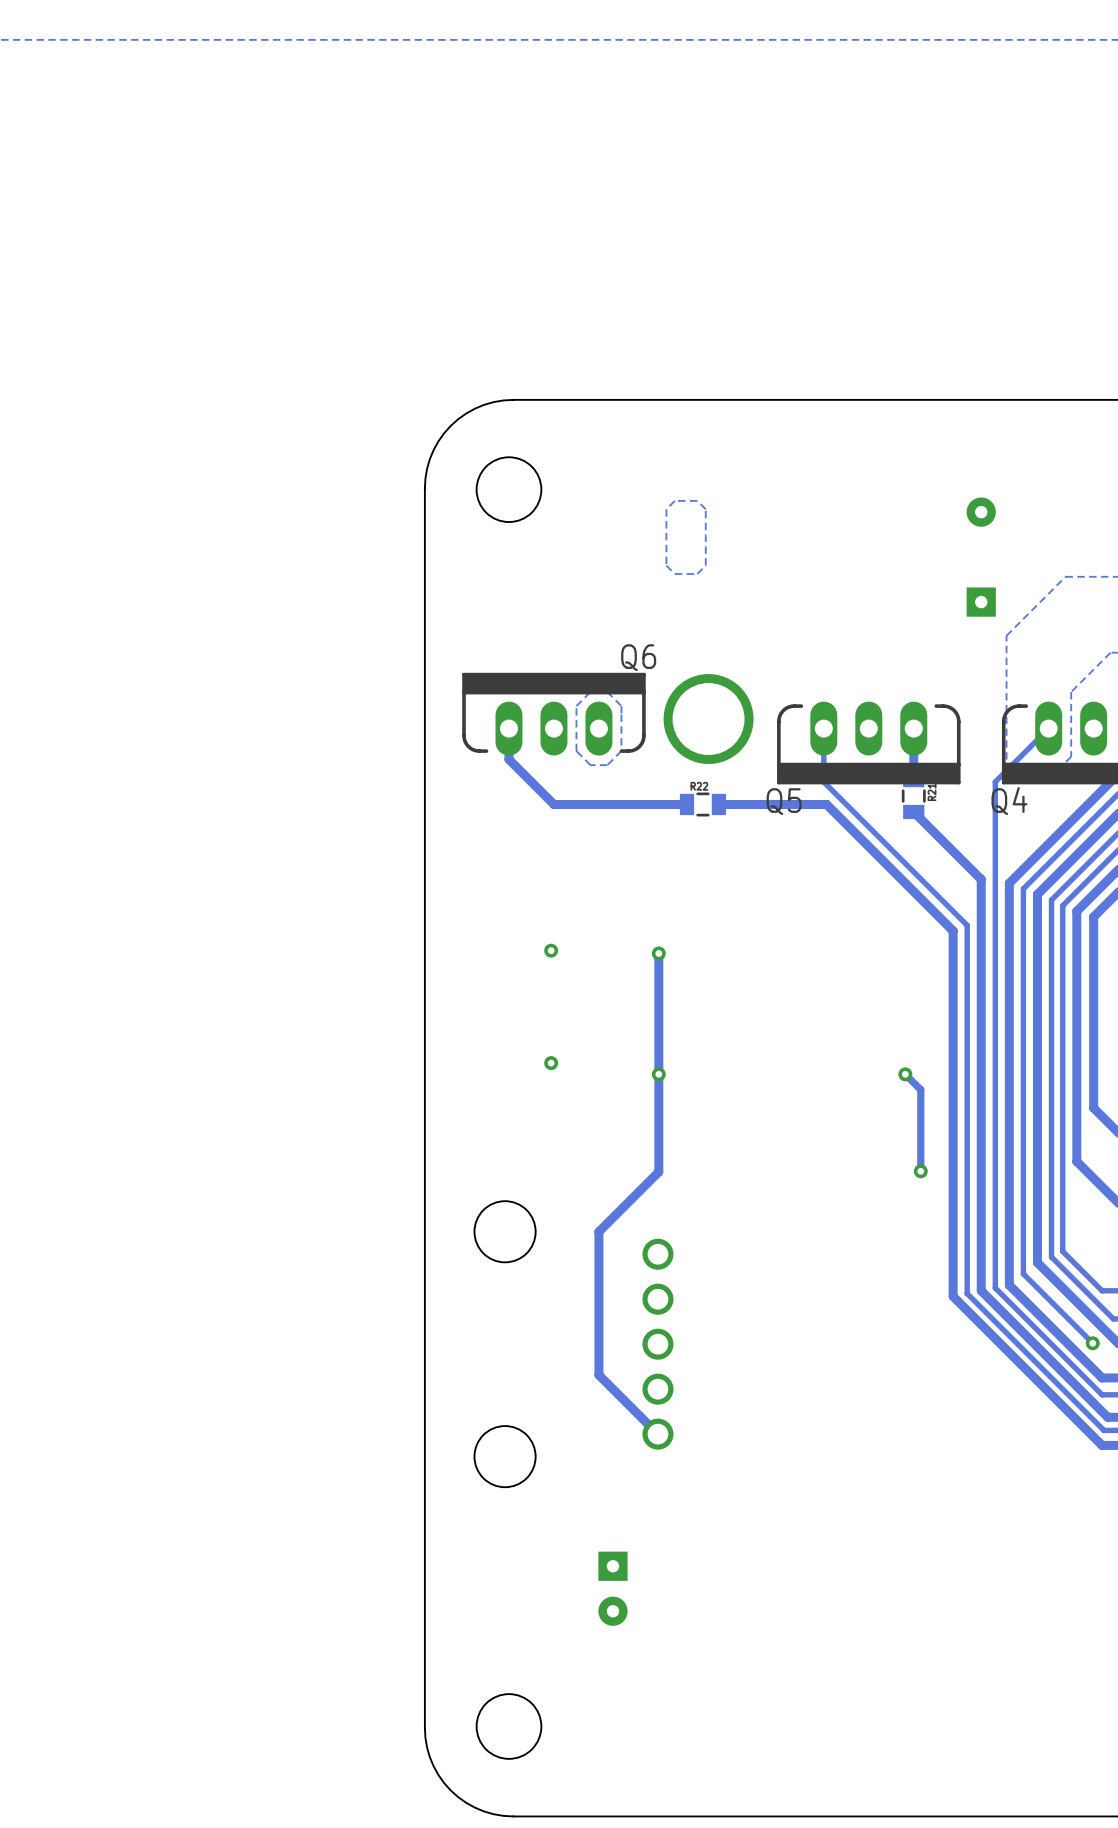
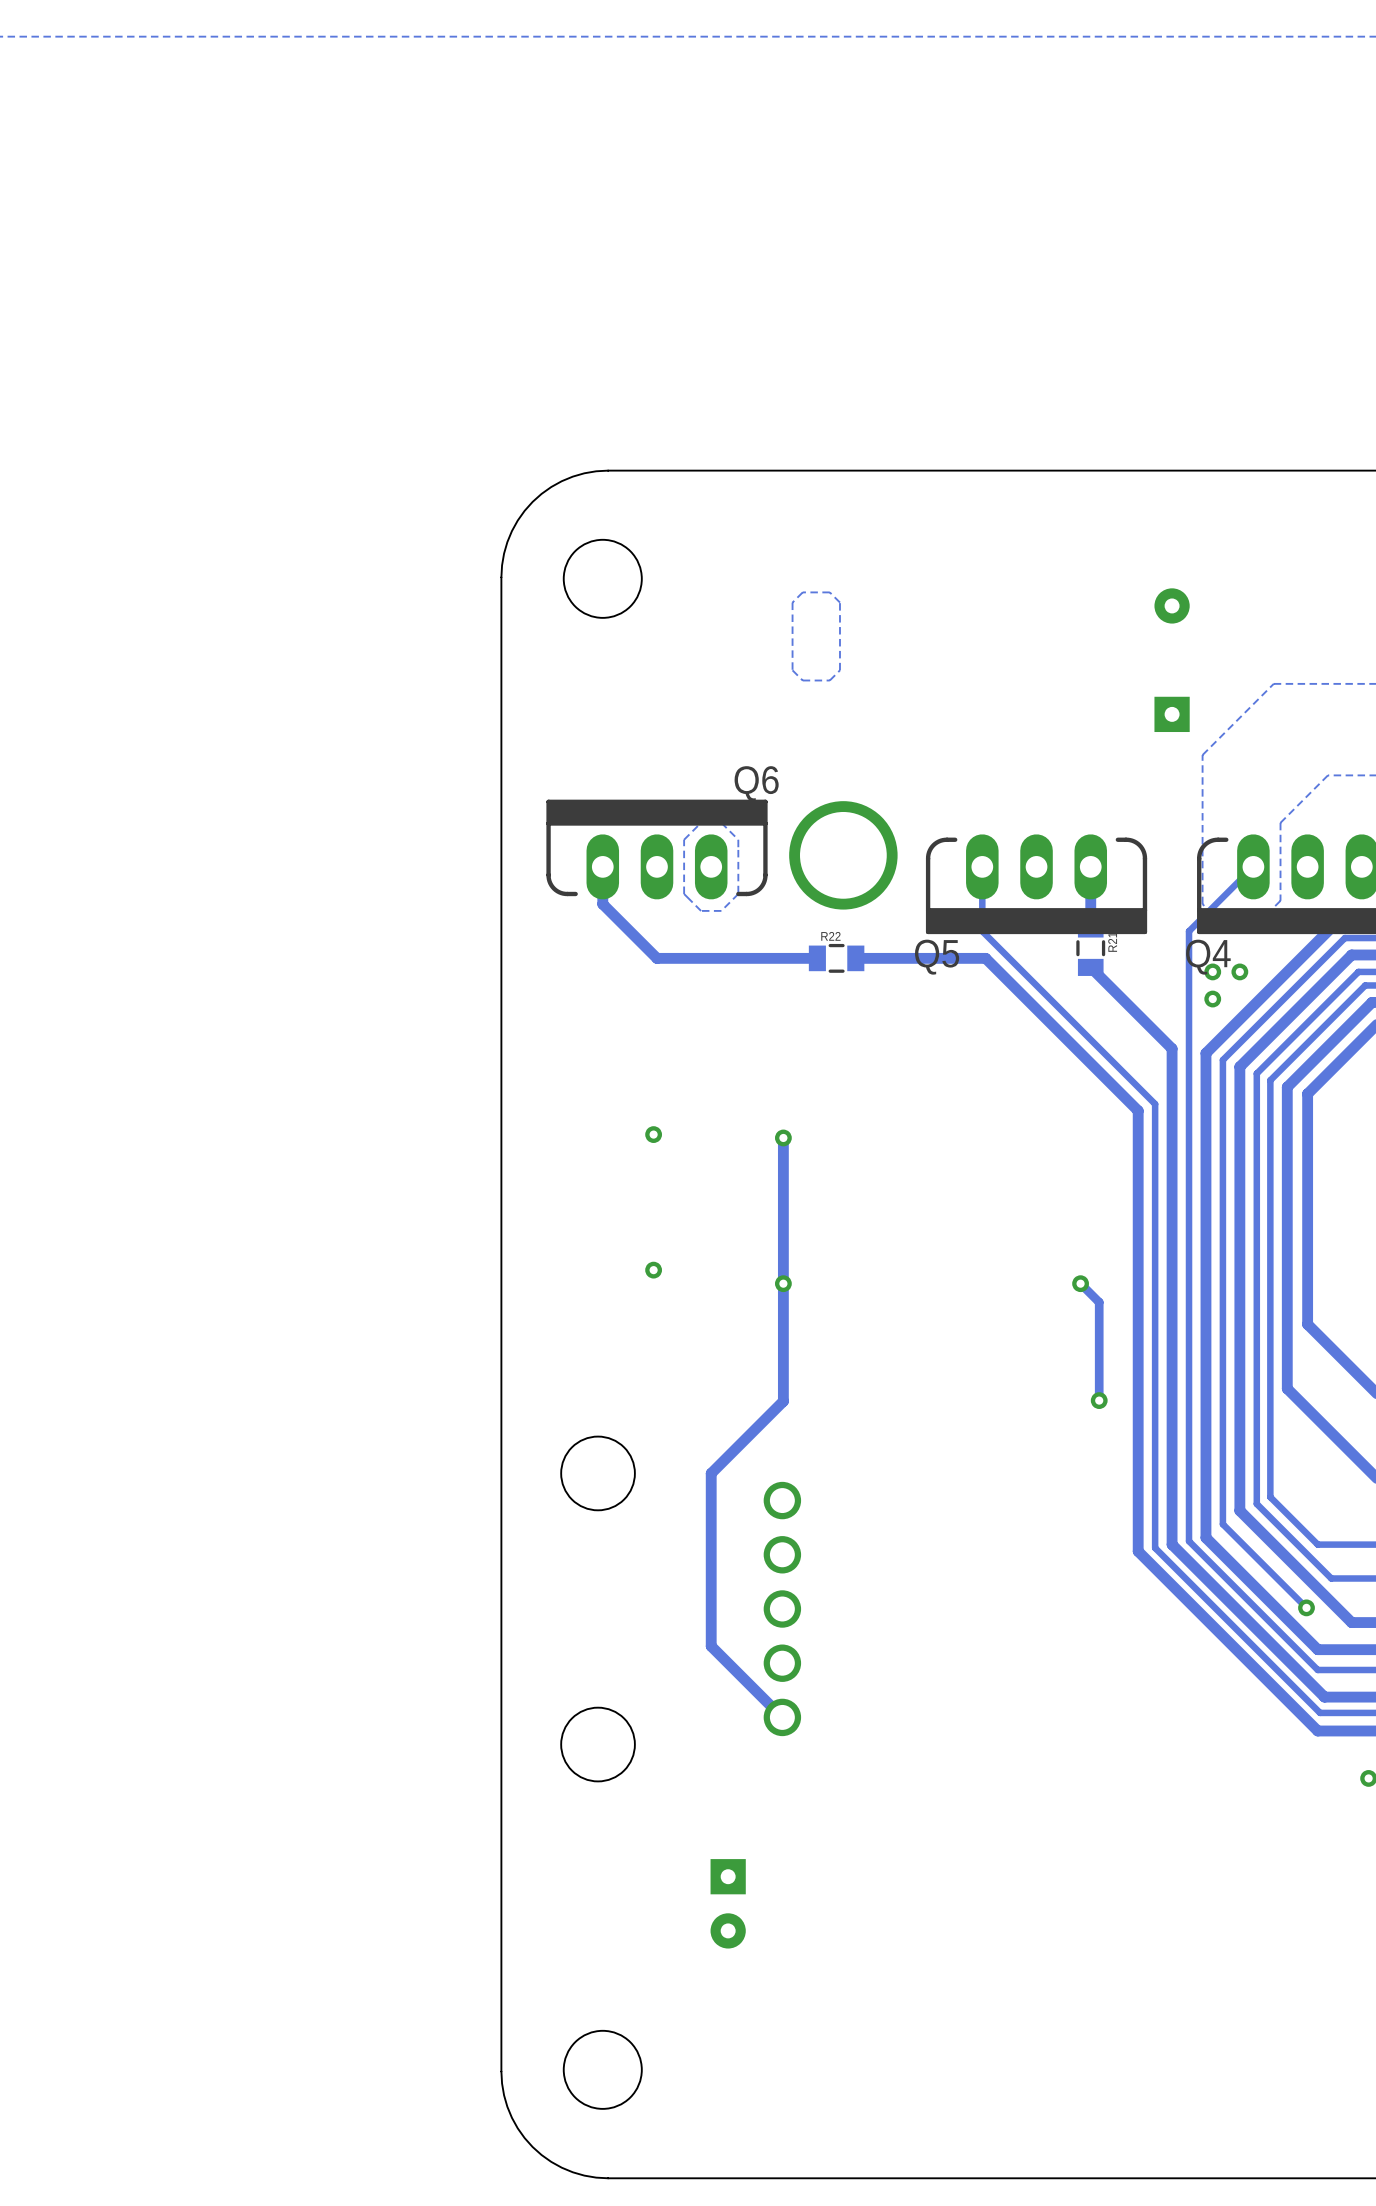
via: none -> (1212, 971)
via: none -> (1239, 971)
via: none -> (1212, 999)

